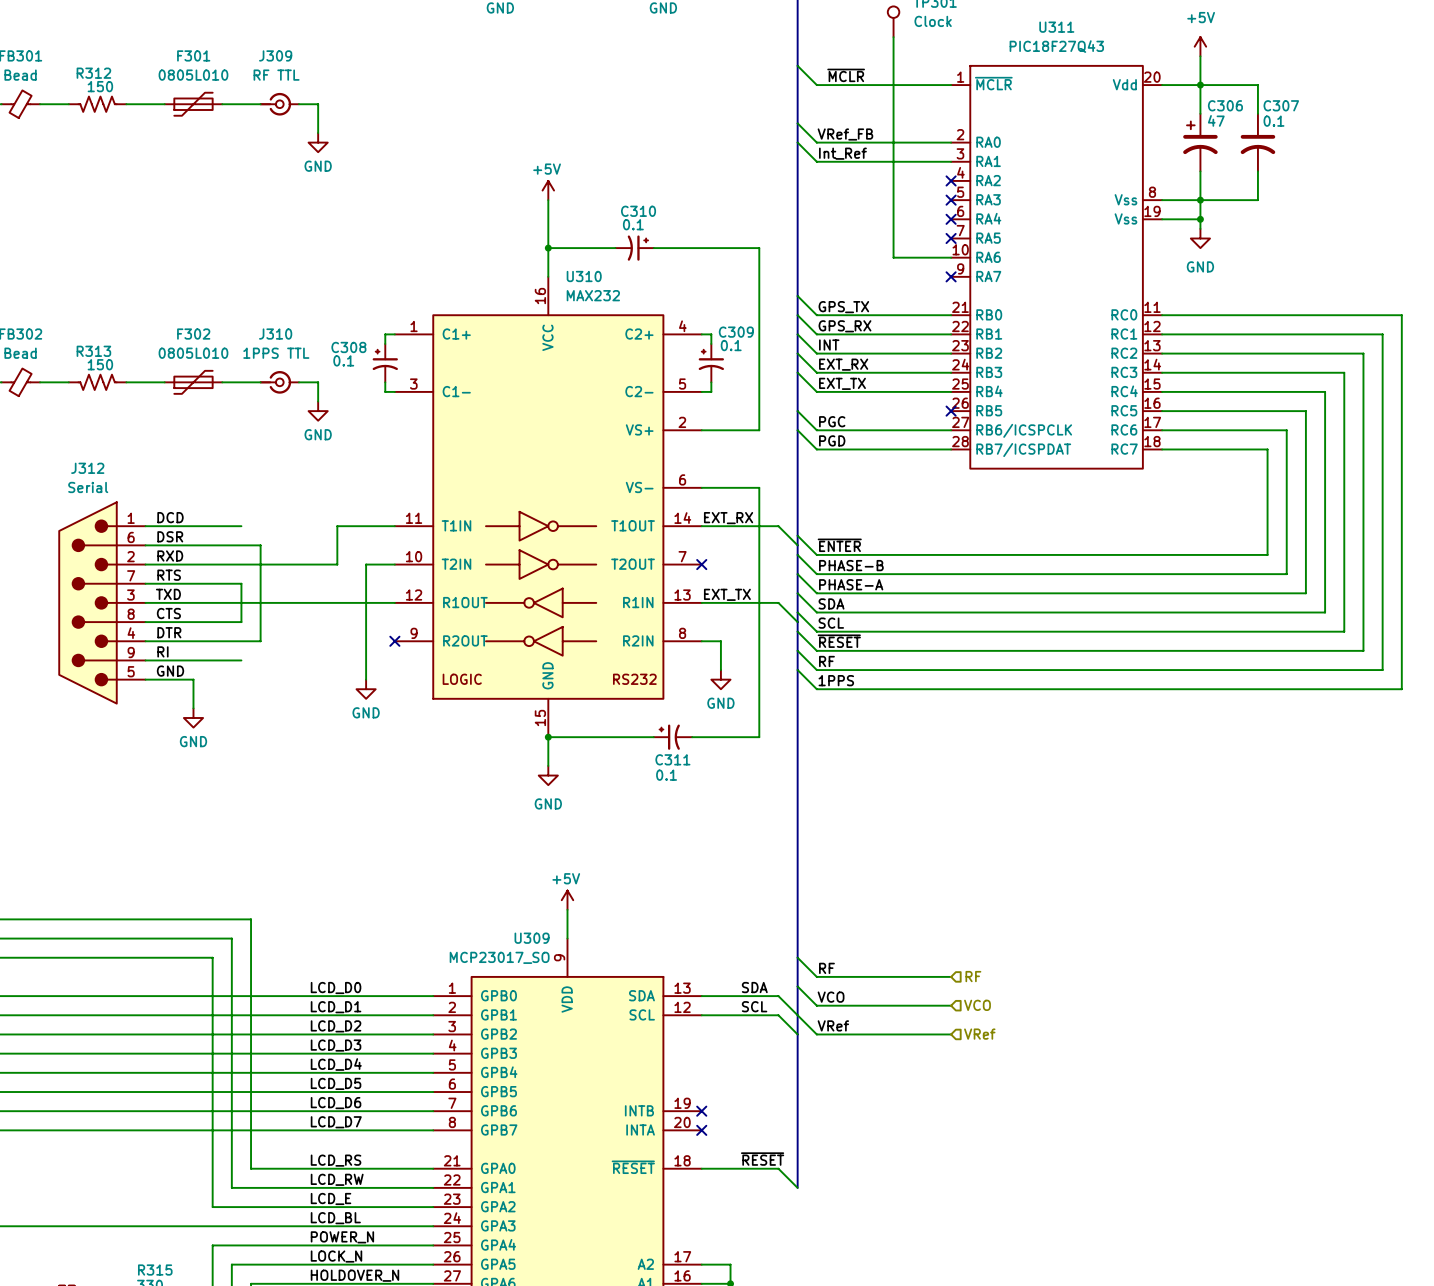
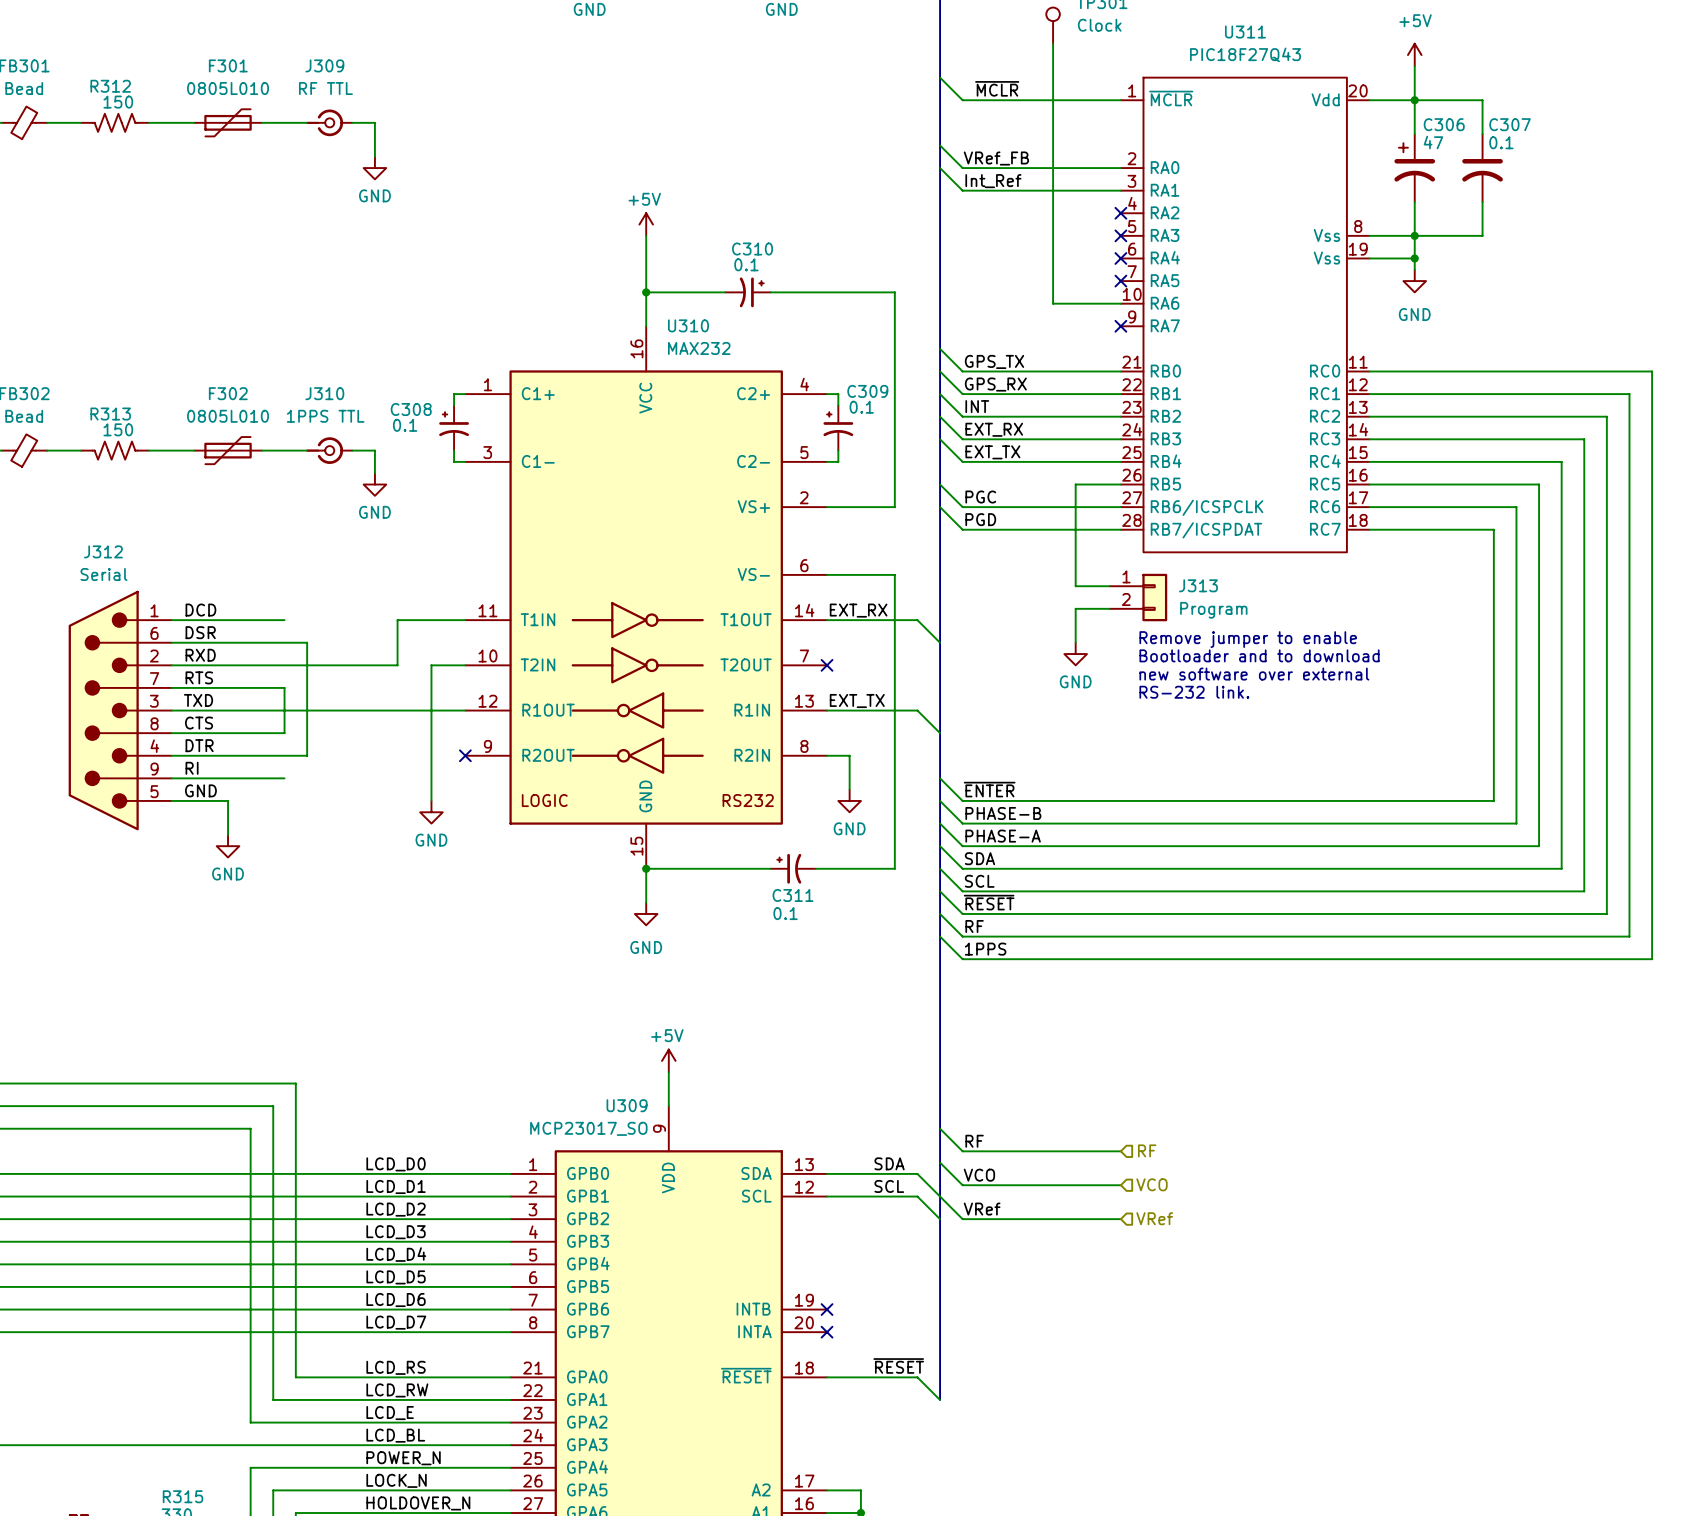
wire: none -> (1120, 484) (1075, 484) (1075, 586) (1109, 586)
no-connect mark: (951, 411) -> none
J313: none -> Program (1138, 597)
wire: none -> (1109, 608) (1075, 608) (1075, 642)
wire: (797, 535) (816, 554) (1267, 554) -> (940, 778) (962, 800) (1493, 800) (1493, 654)
text: none -> Remove jumper to enable (1248, 639)
label position: ~{ENTER} (839, 545) -> ~{ENTER} (989, 789)
wire: (797, 554) (816, 574) (1286, 574) -> (940, 800) (962, 823) (1516, 823) (1516, 676)
power symbol: none -> GND (1075, 654)
text: none -> Bootloader and to download (1259, 655)
label position: PHASE-B (851, 565) -> PHASE-B (1003, 813)
text: none -> new software over external (1254, 674)
wire: (797, 574) (816, 593) (1305, 593) -> (940, 823) (962, 846) (1539, 846) (1539, 699)
label position: PHASE-A (851, 584) -> PHASE-A (1003, 836)
text: none -> RS-232 link. (1194, 692)
wire: (797, 593) (816, 612) (1325, 612) -> (940, 846) (962, 868) (1561, 868) (1561, 721)
label position: SDA (831, 603) -> SDA (979, 858)
wire: (797, 612) (816, 631) (1344, 631) -> (940, 868) (962, 891) (1584, 891) (1584, 744)
label position: SCL (831, 623) -> SCL (979, 881)
wire: (797, 631) (816, 650) (1363, 650) -> (940, 891) (962, 913) (1606, 913) (1606, 767)
label position: ~{RESET} (839, 641) -> ~{RESET} (989, 902)
wire: (797, 650) (816, 670) (1382, 670) -> (940, 913) (962, 936) (1629, 936) (1629, 789)
label position: RF (826, 661) -> RF (974, 926)
wire: (797, 670) (816, 689) (1401, 689) -> (940, 936) (962, 959) (1652, 959) (1652, 812)
label position: 1PPS (836, 680) -> 1PPS (985, 949)

